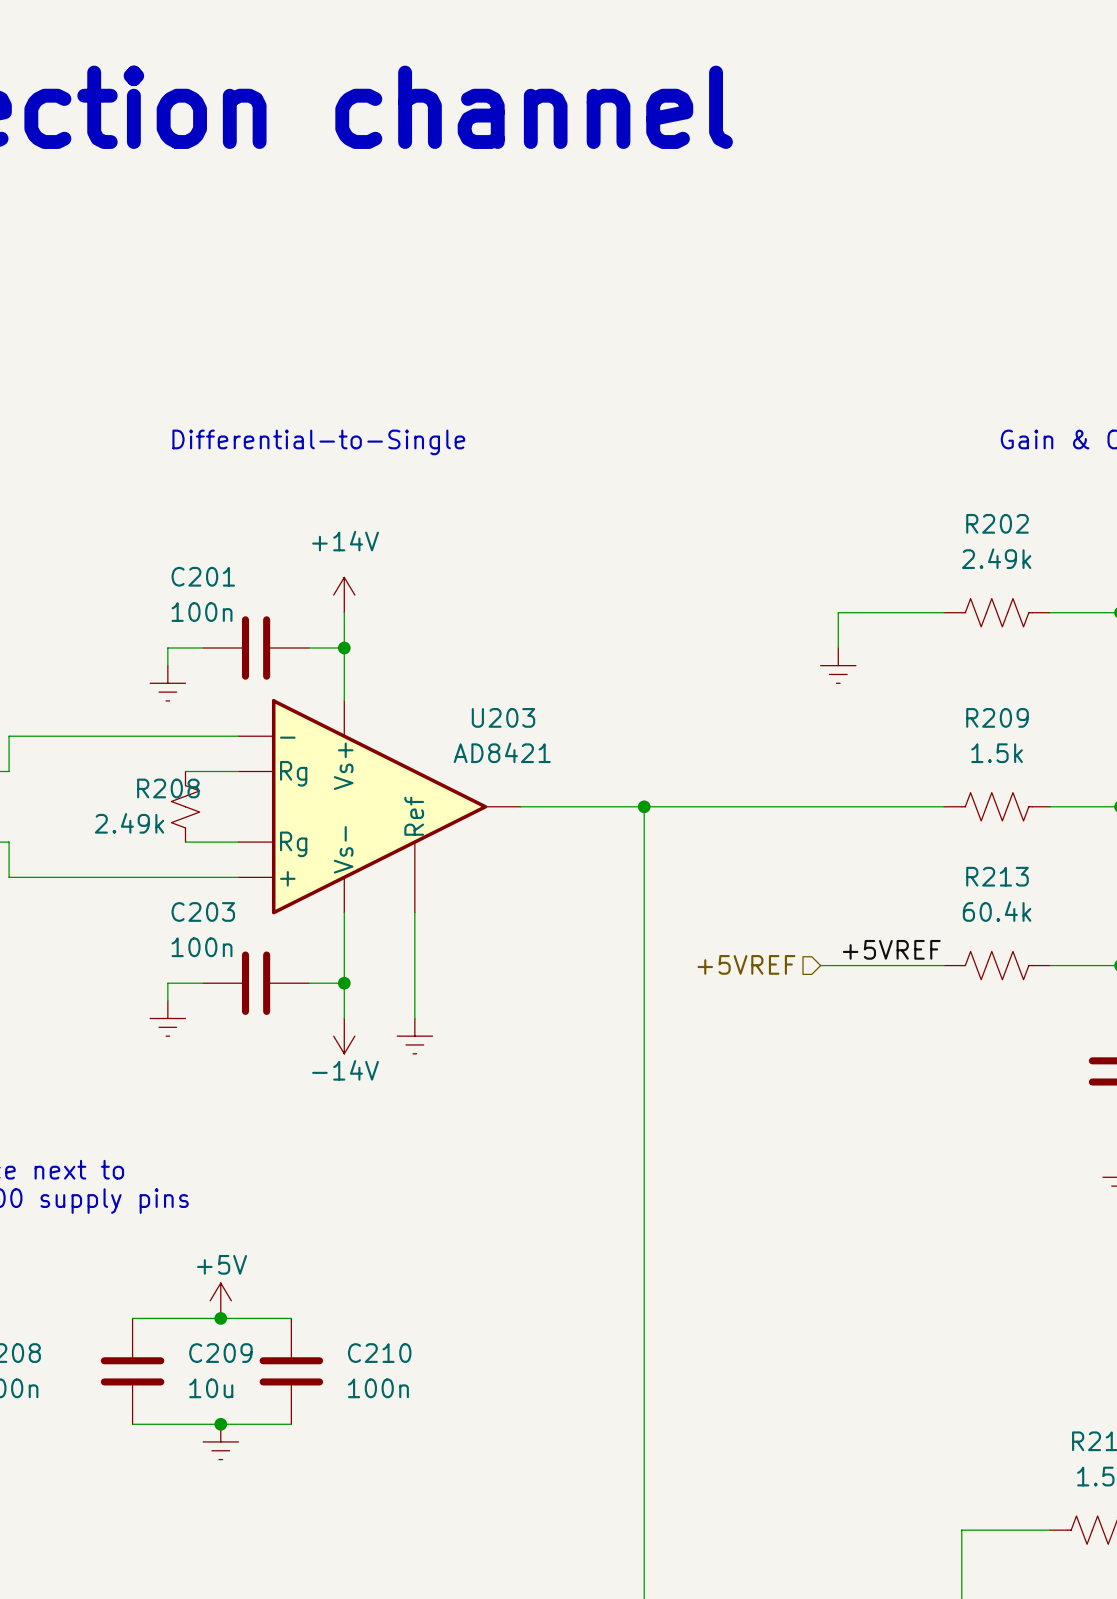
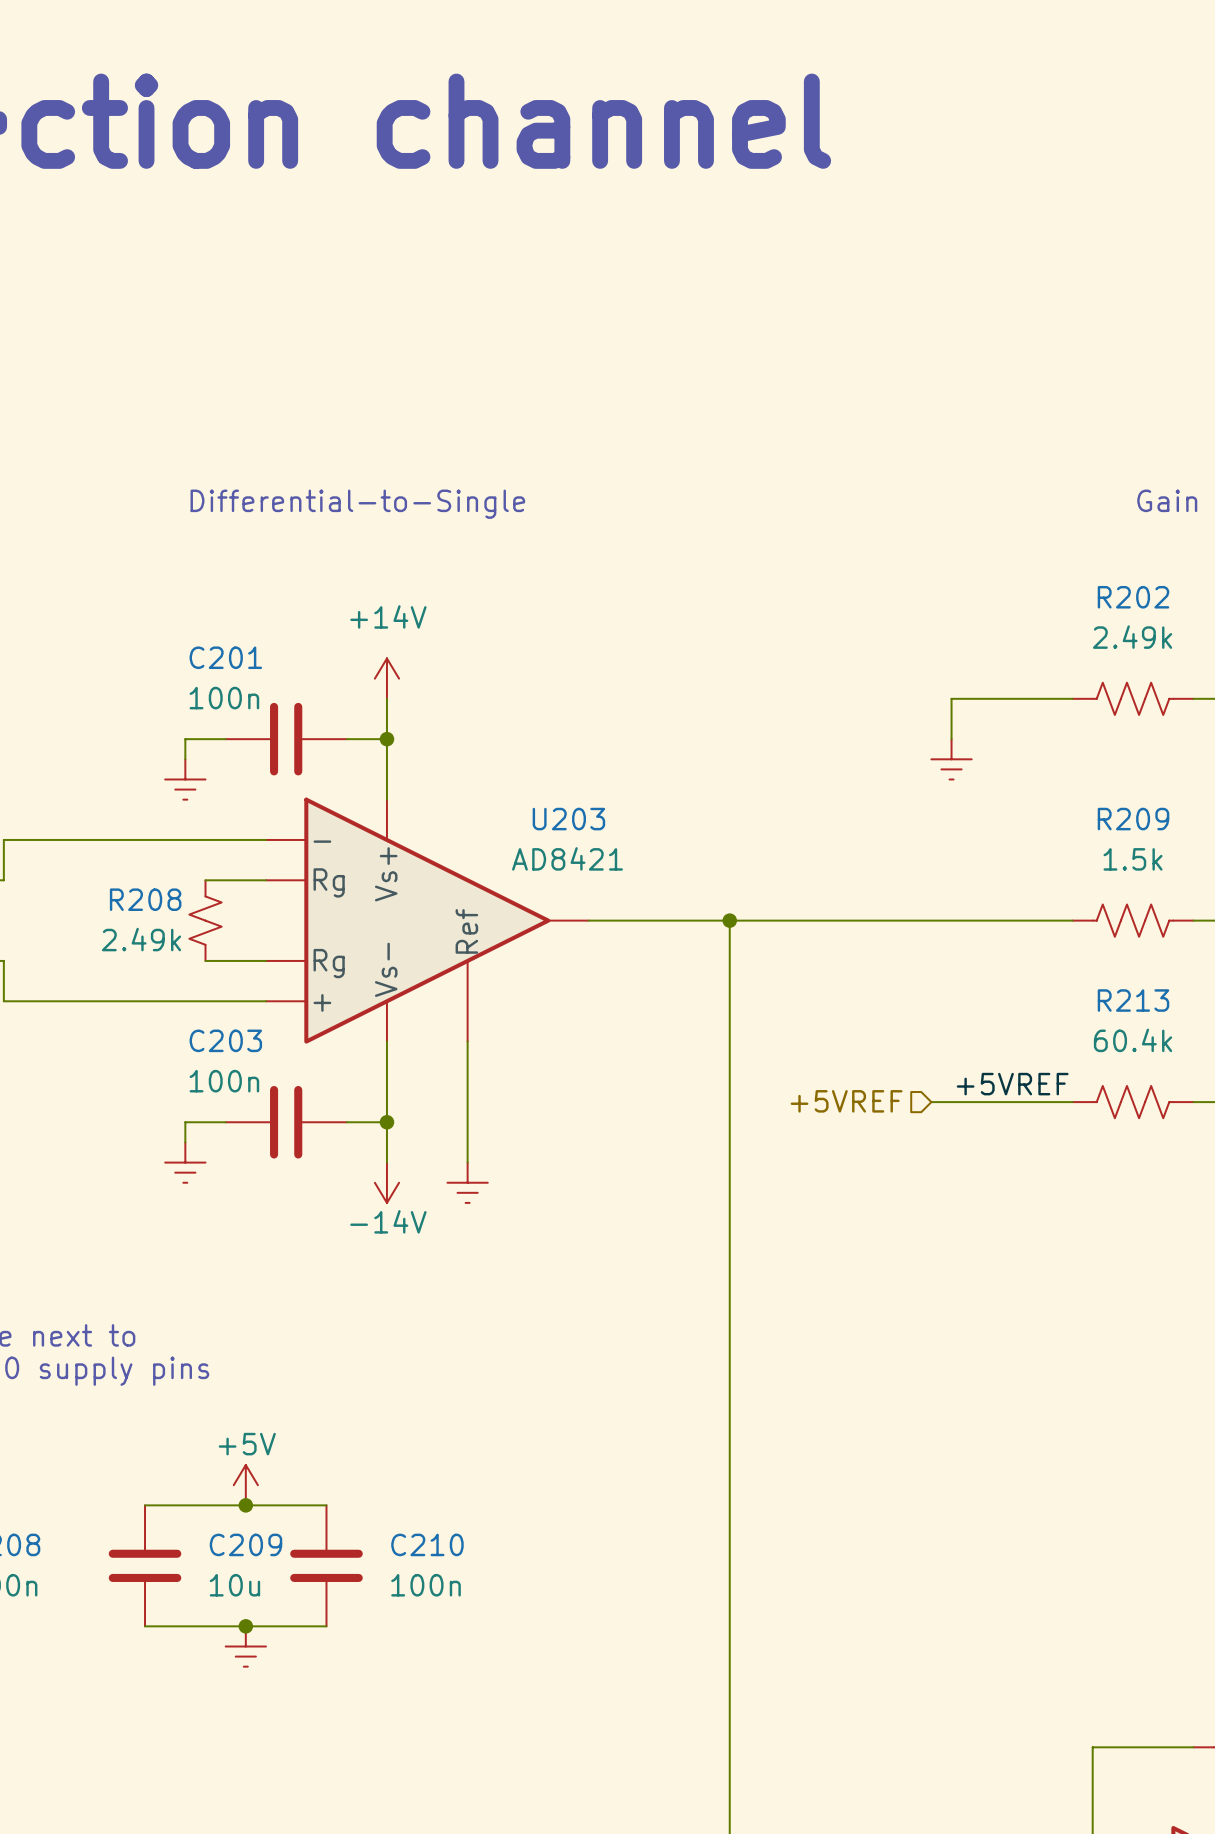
R208 name position: R208 (168, 788) -> R208 (145, 899)

